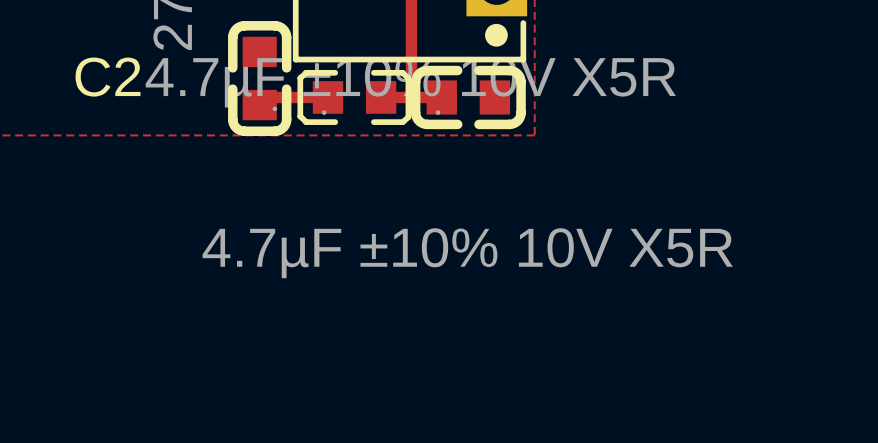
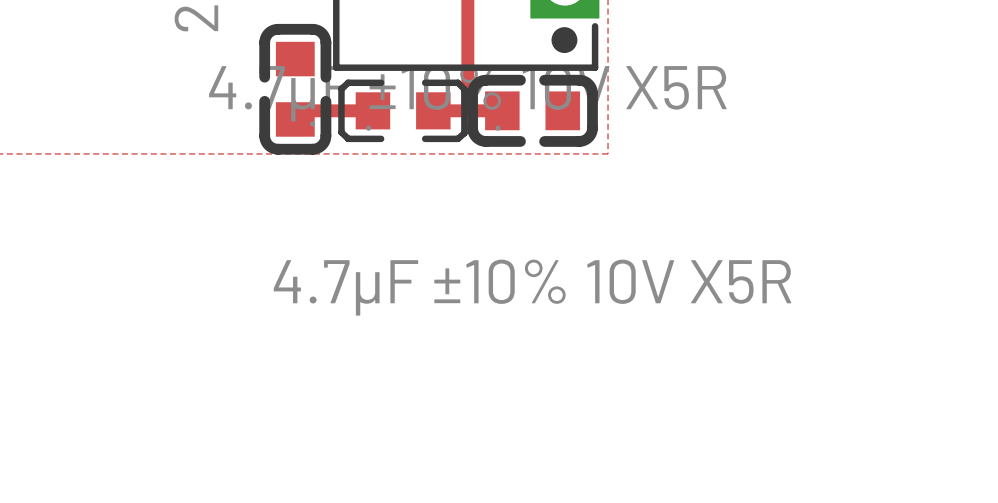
C2 name: C2 (108, 77) -> none

